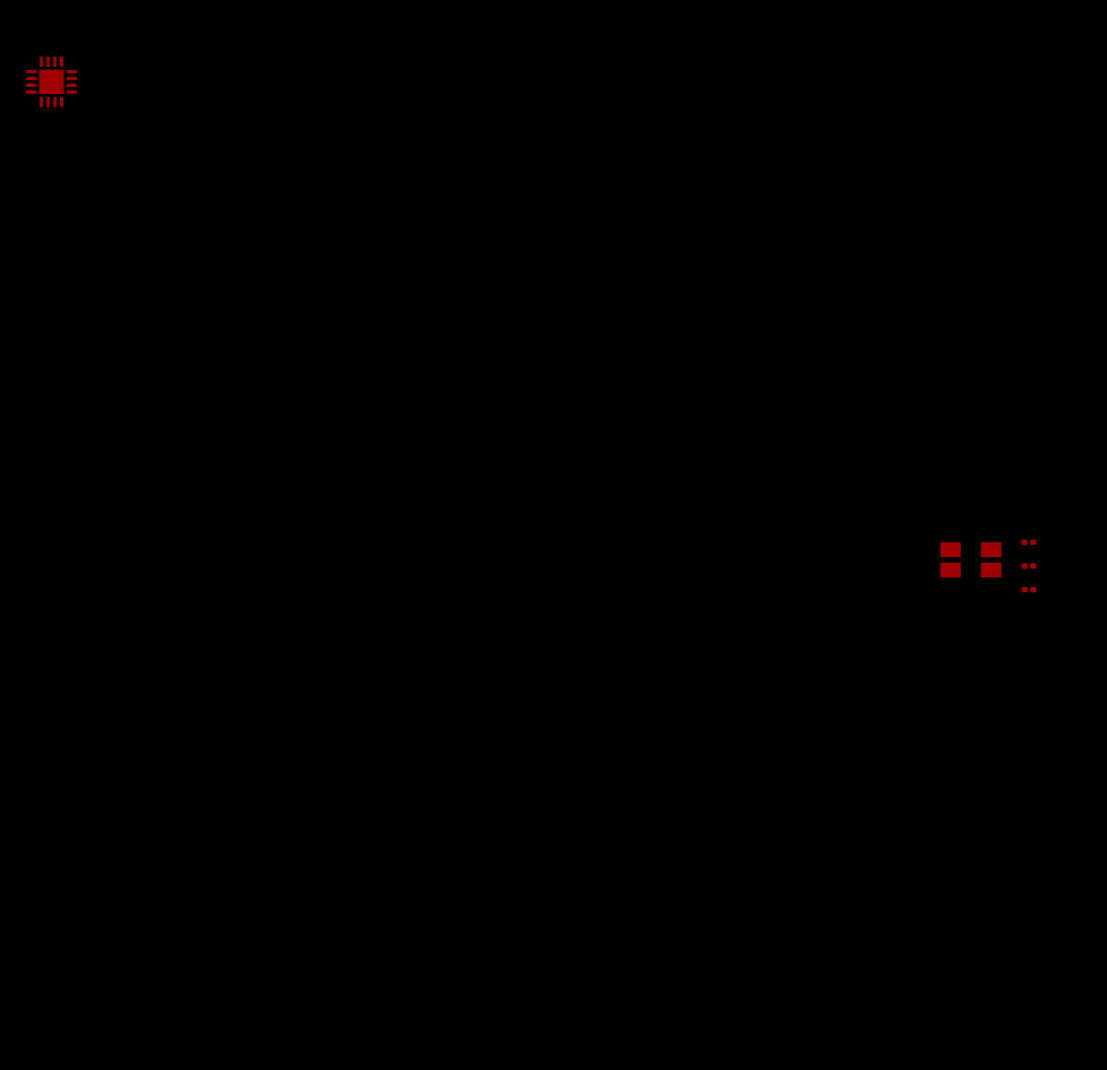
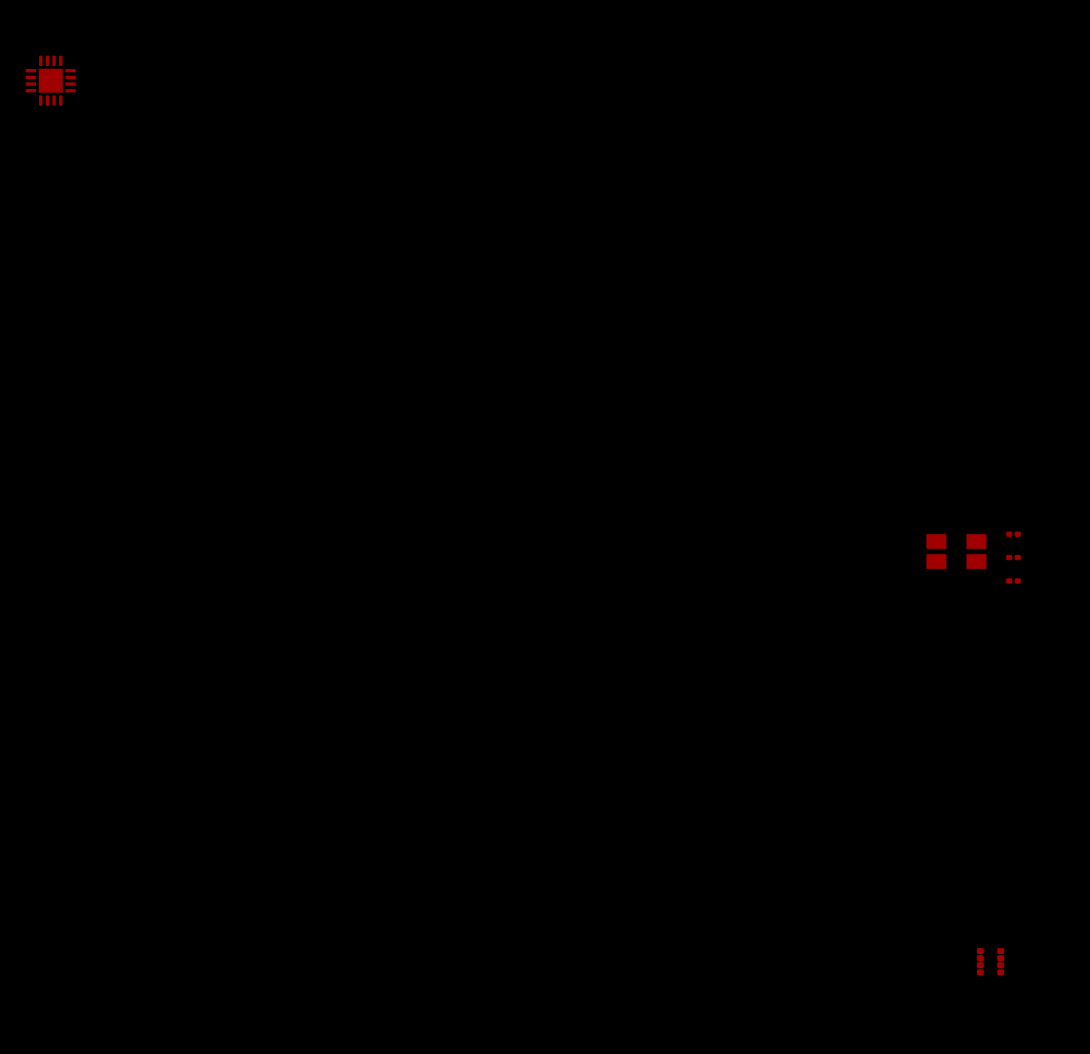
part: none -> (990, 961)

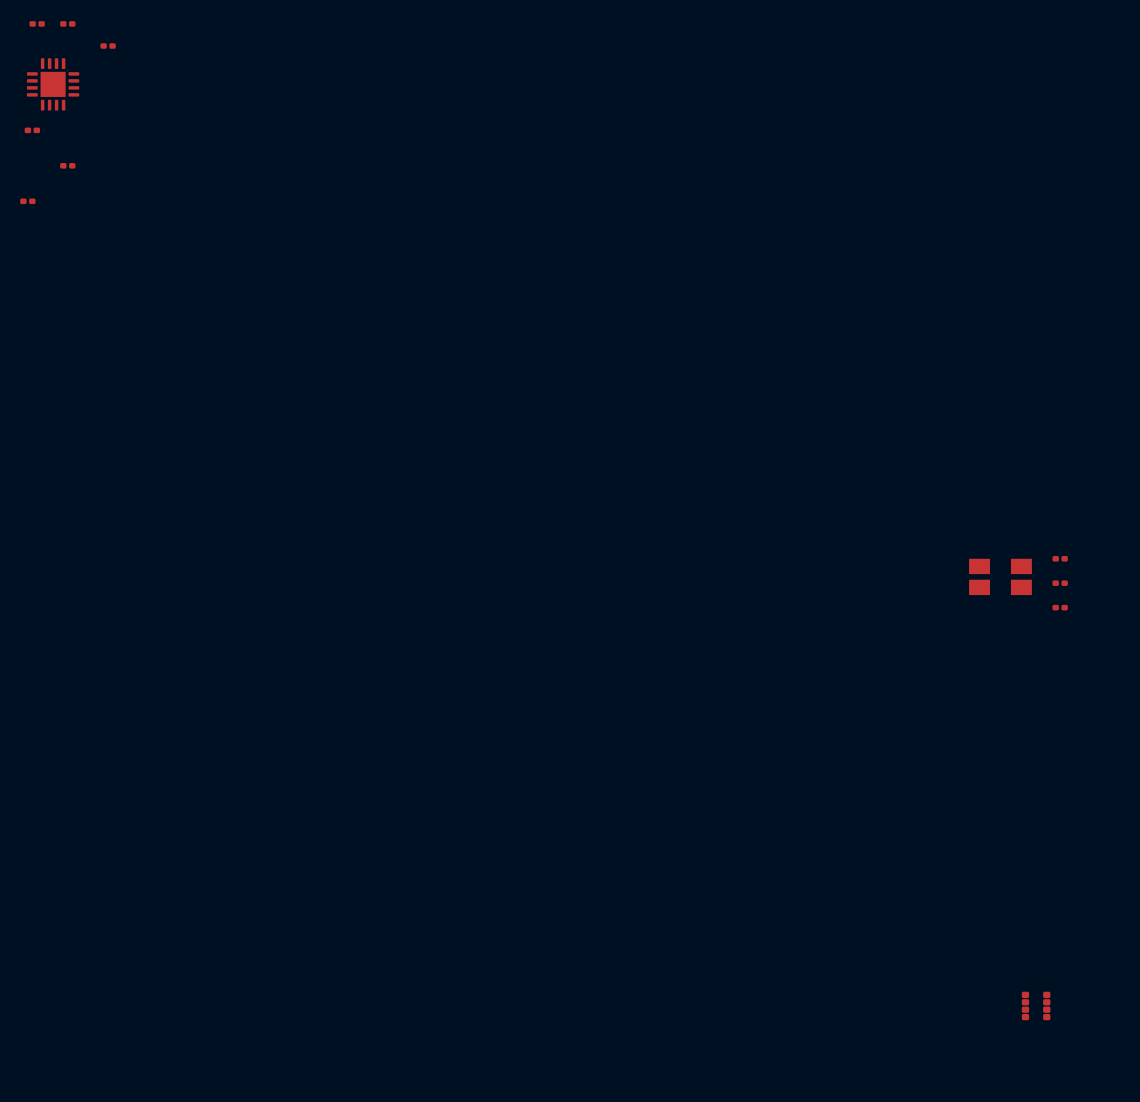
part: none -> (37, 23)
part: none -> (67, 23)
part: none -> (108, 45)
part: none -> (32, 130)
part: none -> (67, 165)
part: none -> (27, 201)

